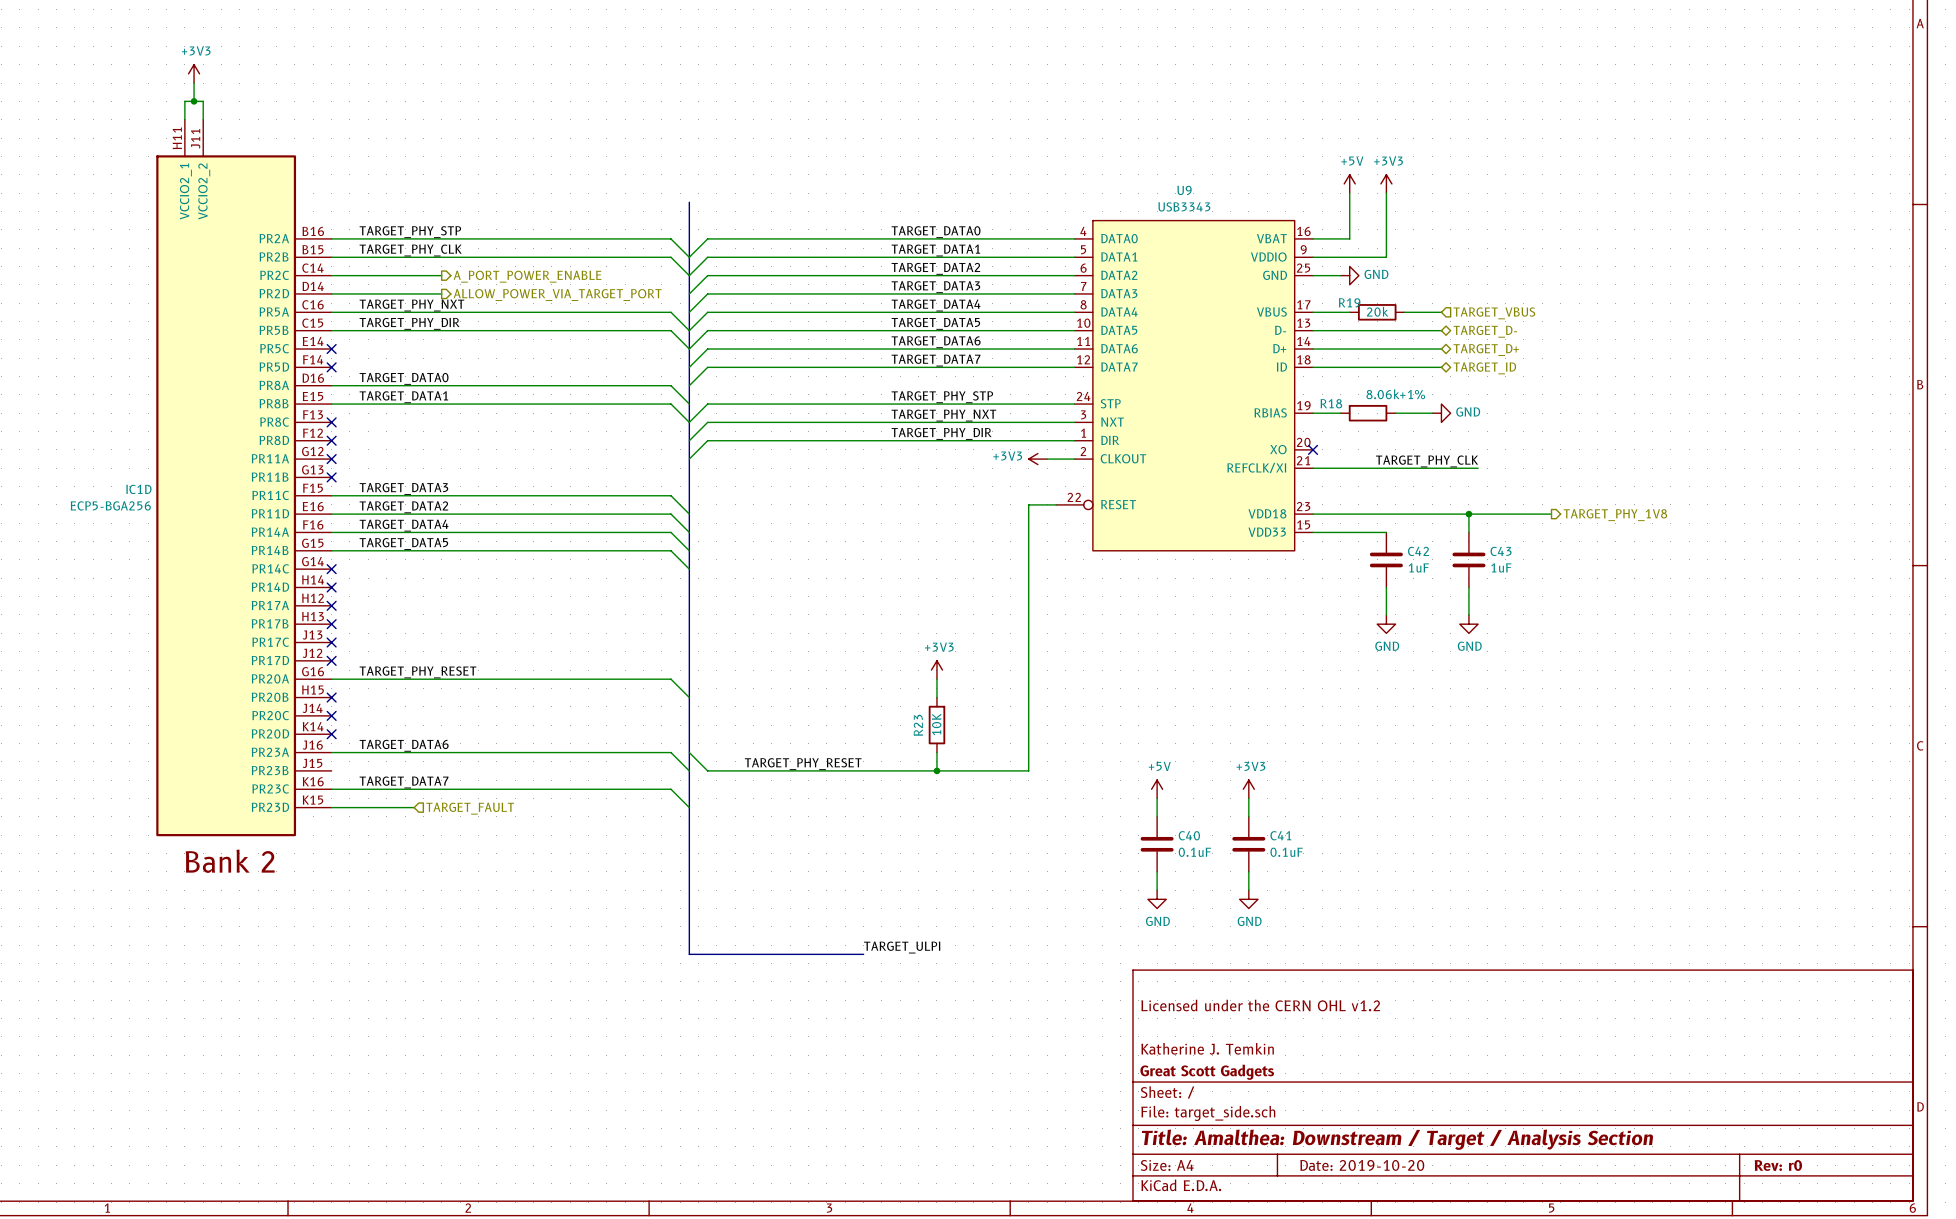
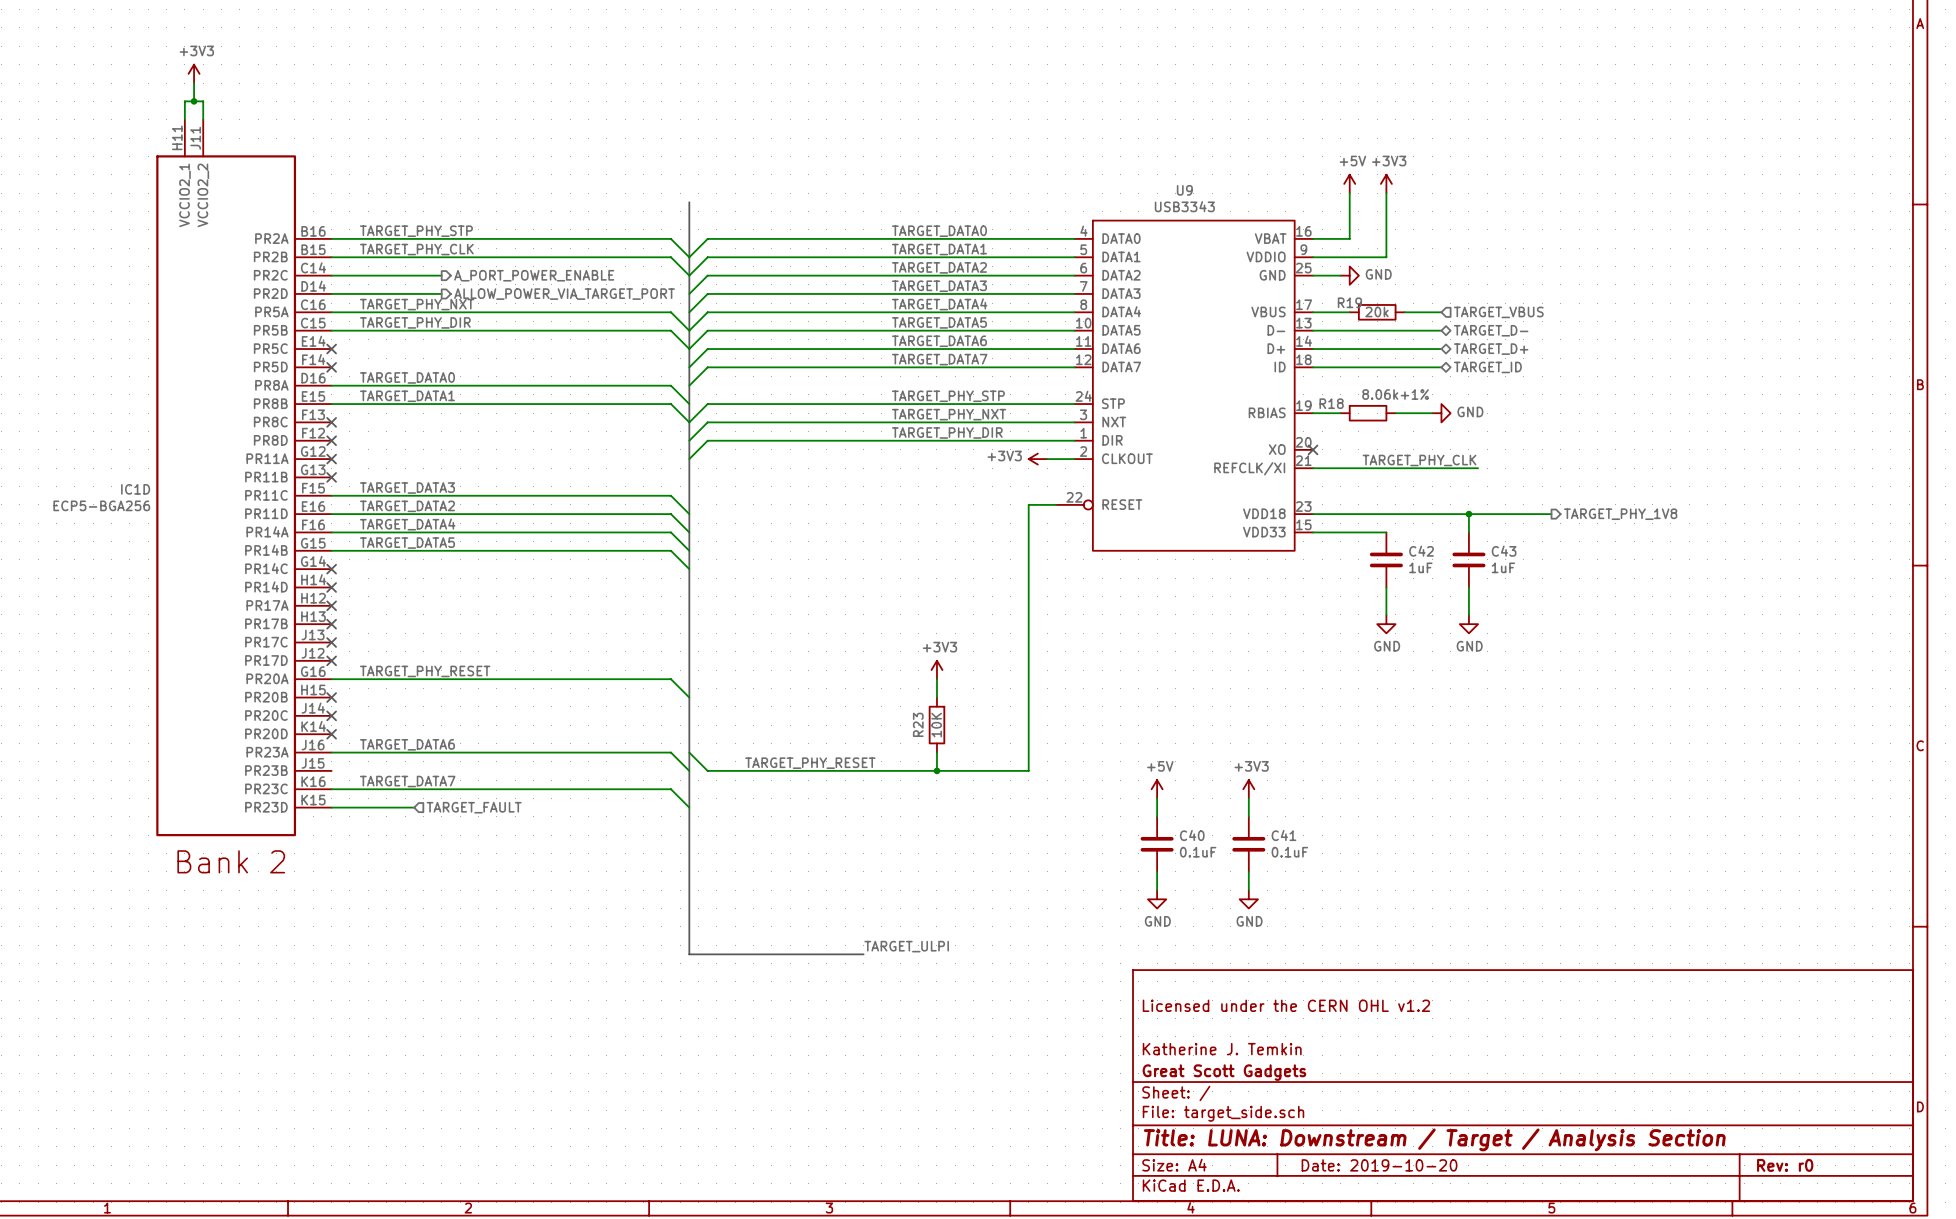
title block: Title: Amalthea: Downstream / Target / Analysis Section (1397, 1139) -> Title: LUNA: Downstream / Target / Analysis Section (1434, 1139)

